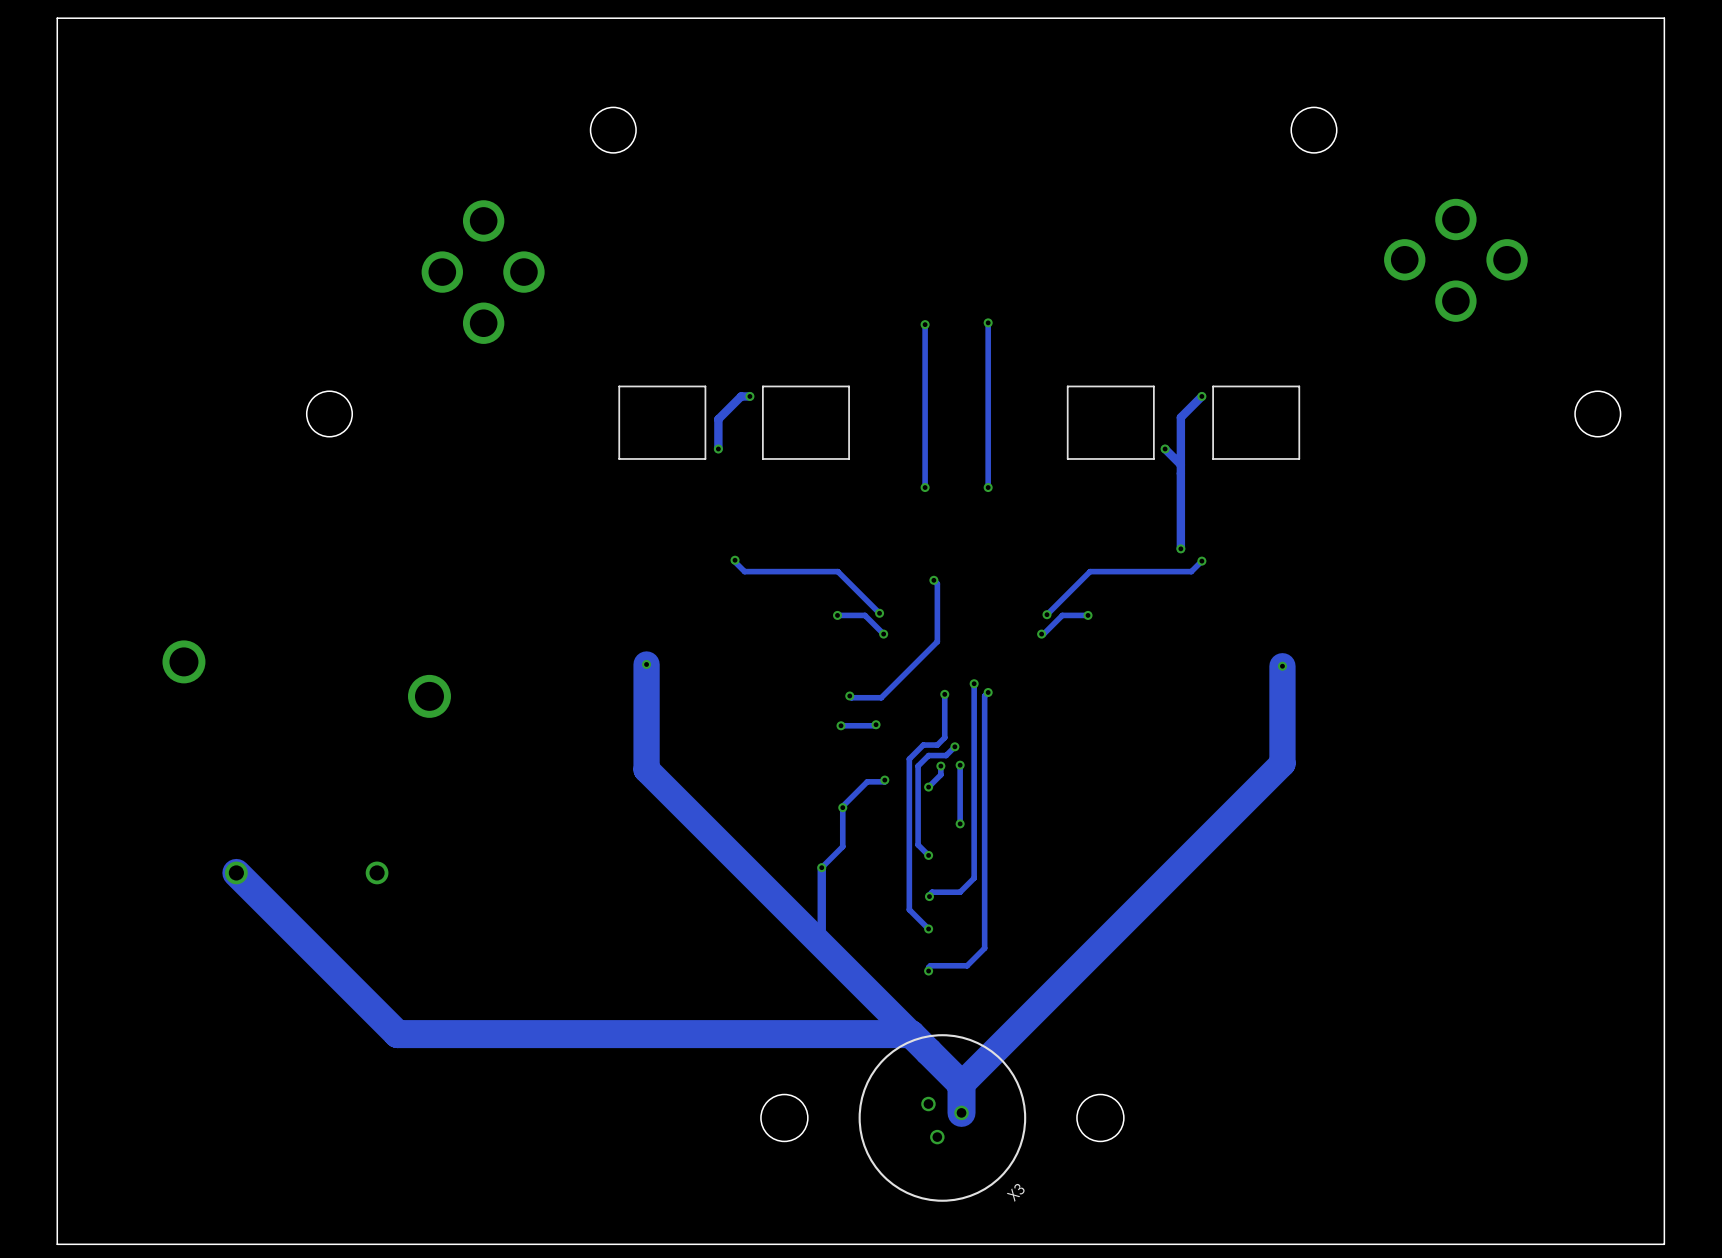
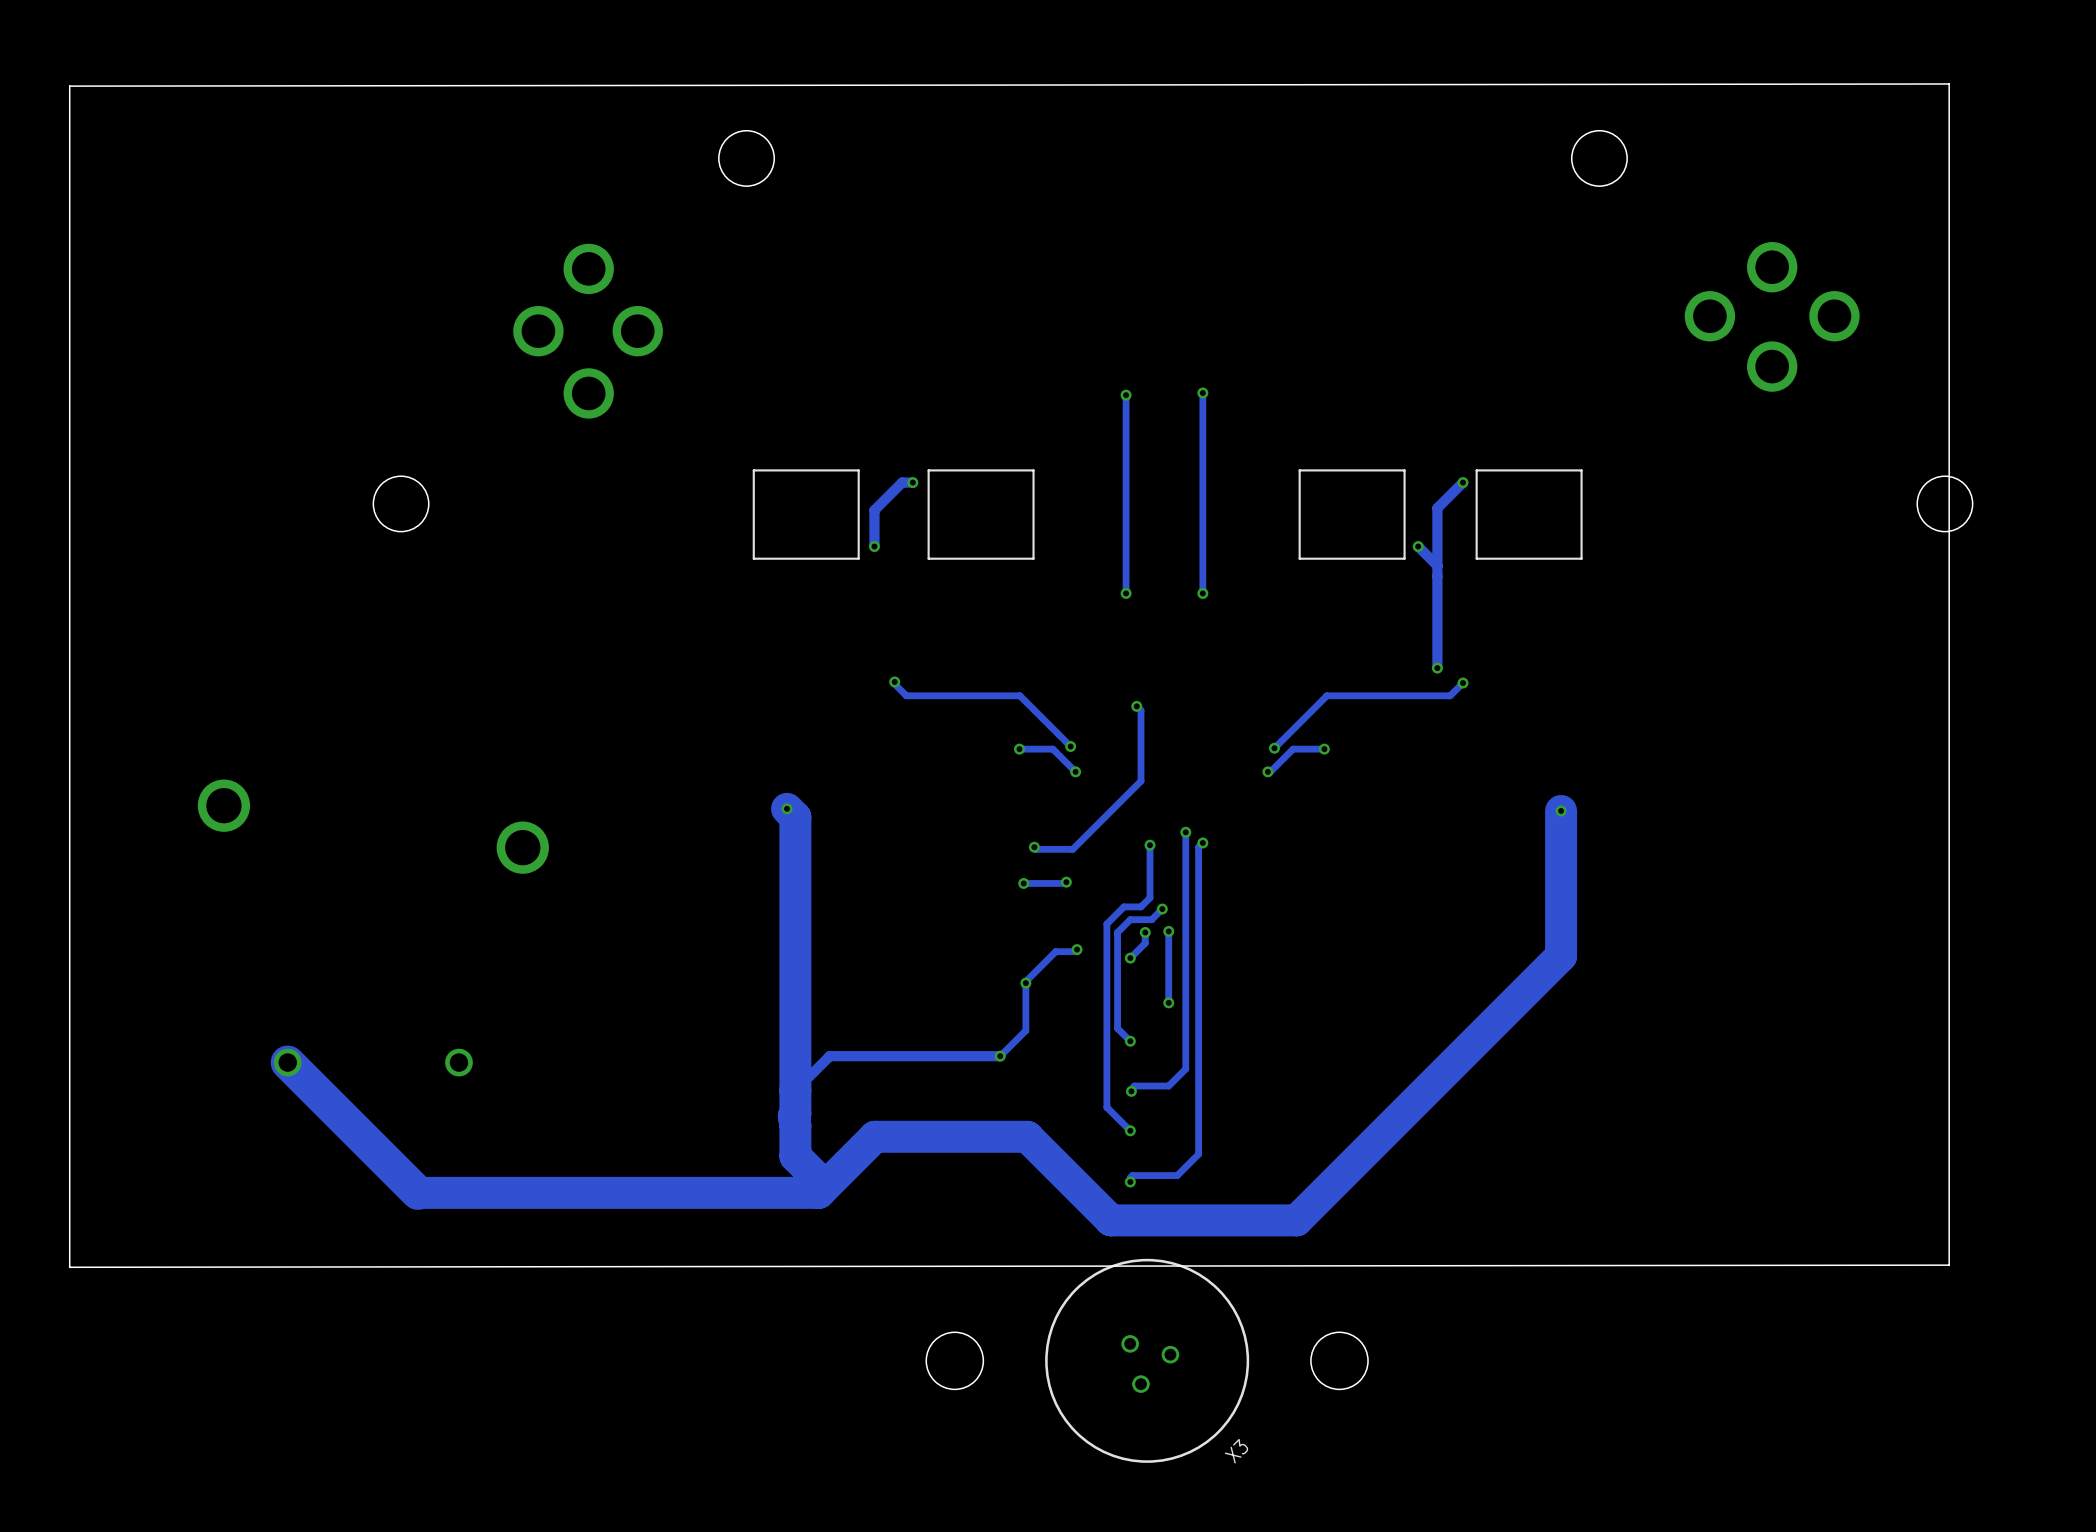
board edge: (57, 70) (57, 18) (1664, 18) (1664, 1244) (57, 1244) (57, 1041) -> (69, 86) (1949, 83) (1949, 1265) (69, 1267)
track: (646, 664) (646, 769) (928, 1051) (821, 944) (821, 867) -> (787, 808) (795, 817) (795, 1113) (793, 1116) (795, 1156) (816, 1177)
track: (1282, 763) (961, 1084) -> none
track: none -> (1000, 1056) (829, 1056) (795, 1090)
track: (343, 979) (397, 1034) (911, 1034) (961, 1084) -> (418, 1192) (818, 1192) (874, 1136) (1027, 1136) (1110, 1220) (1296, 1220) (1561, 955) (1561, 929)
track: (961, 1084) (961, 1112) -> none

